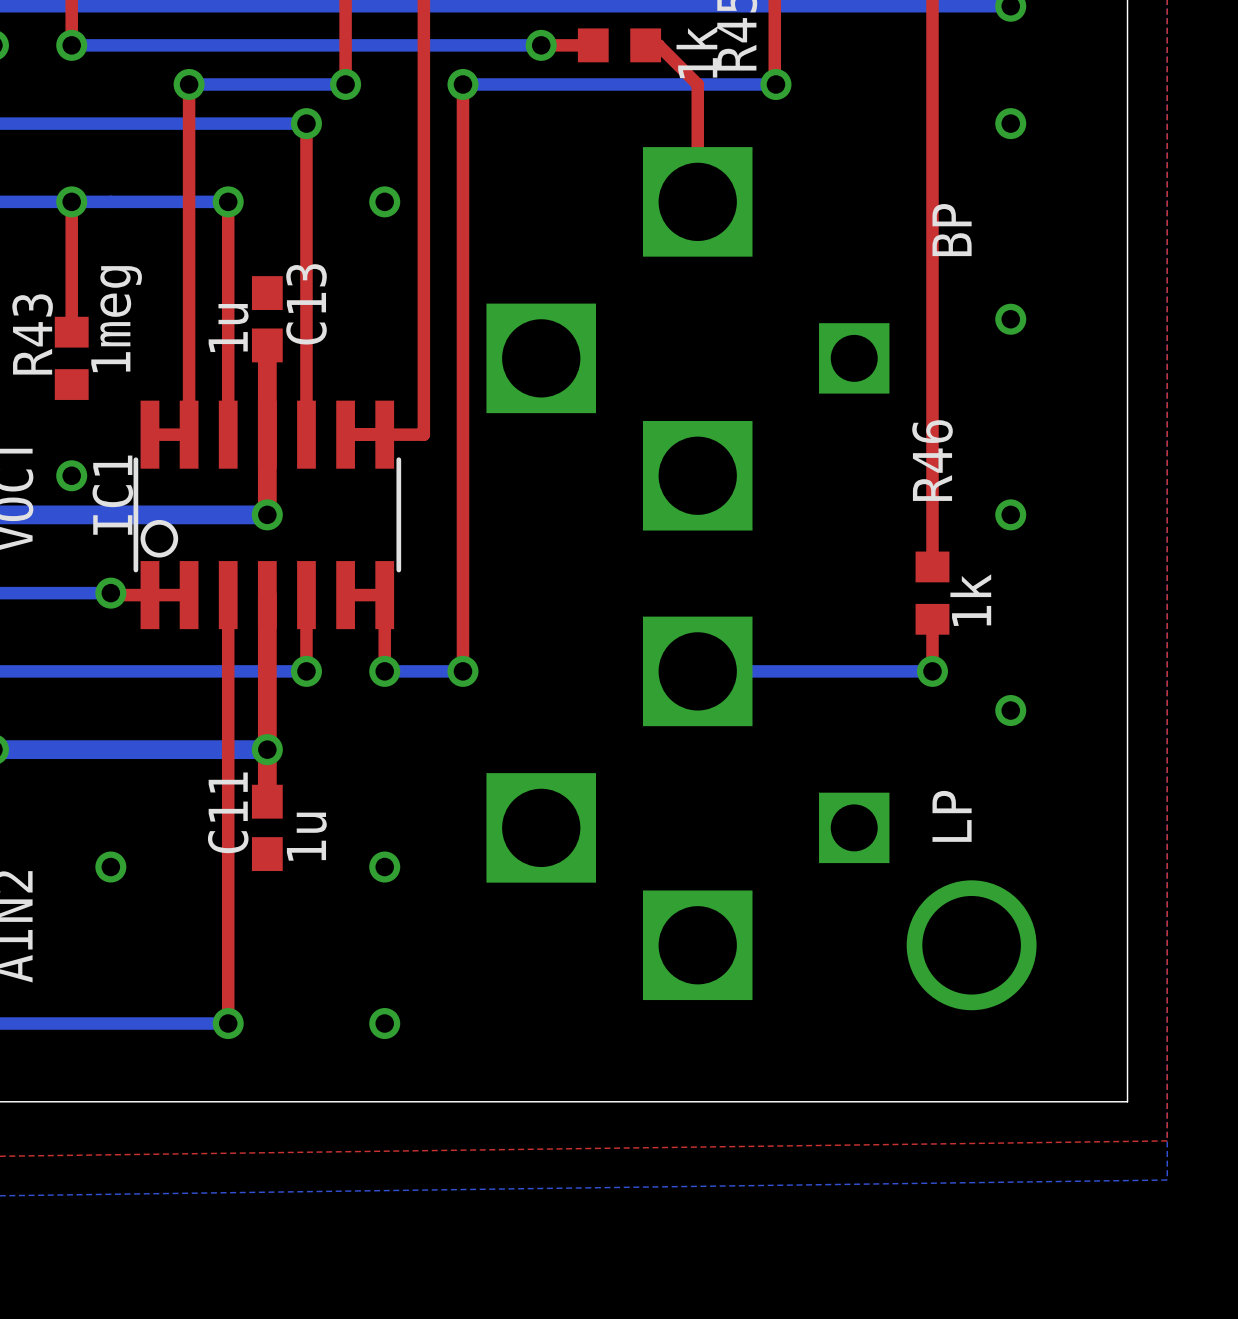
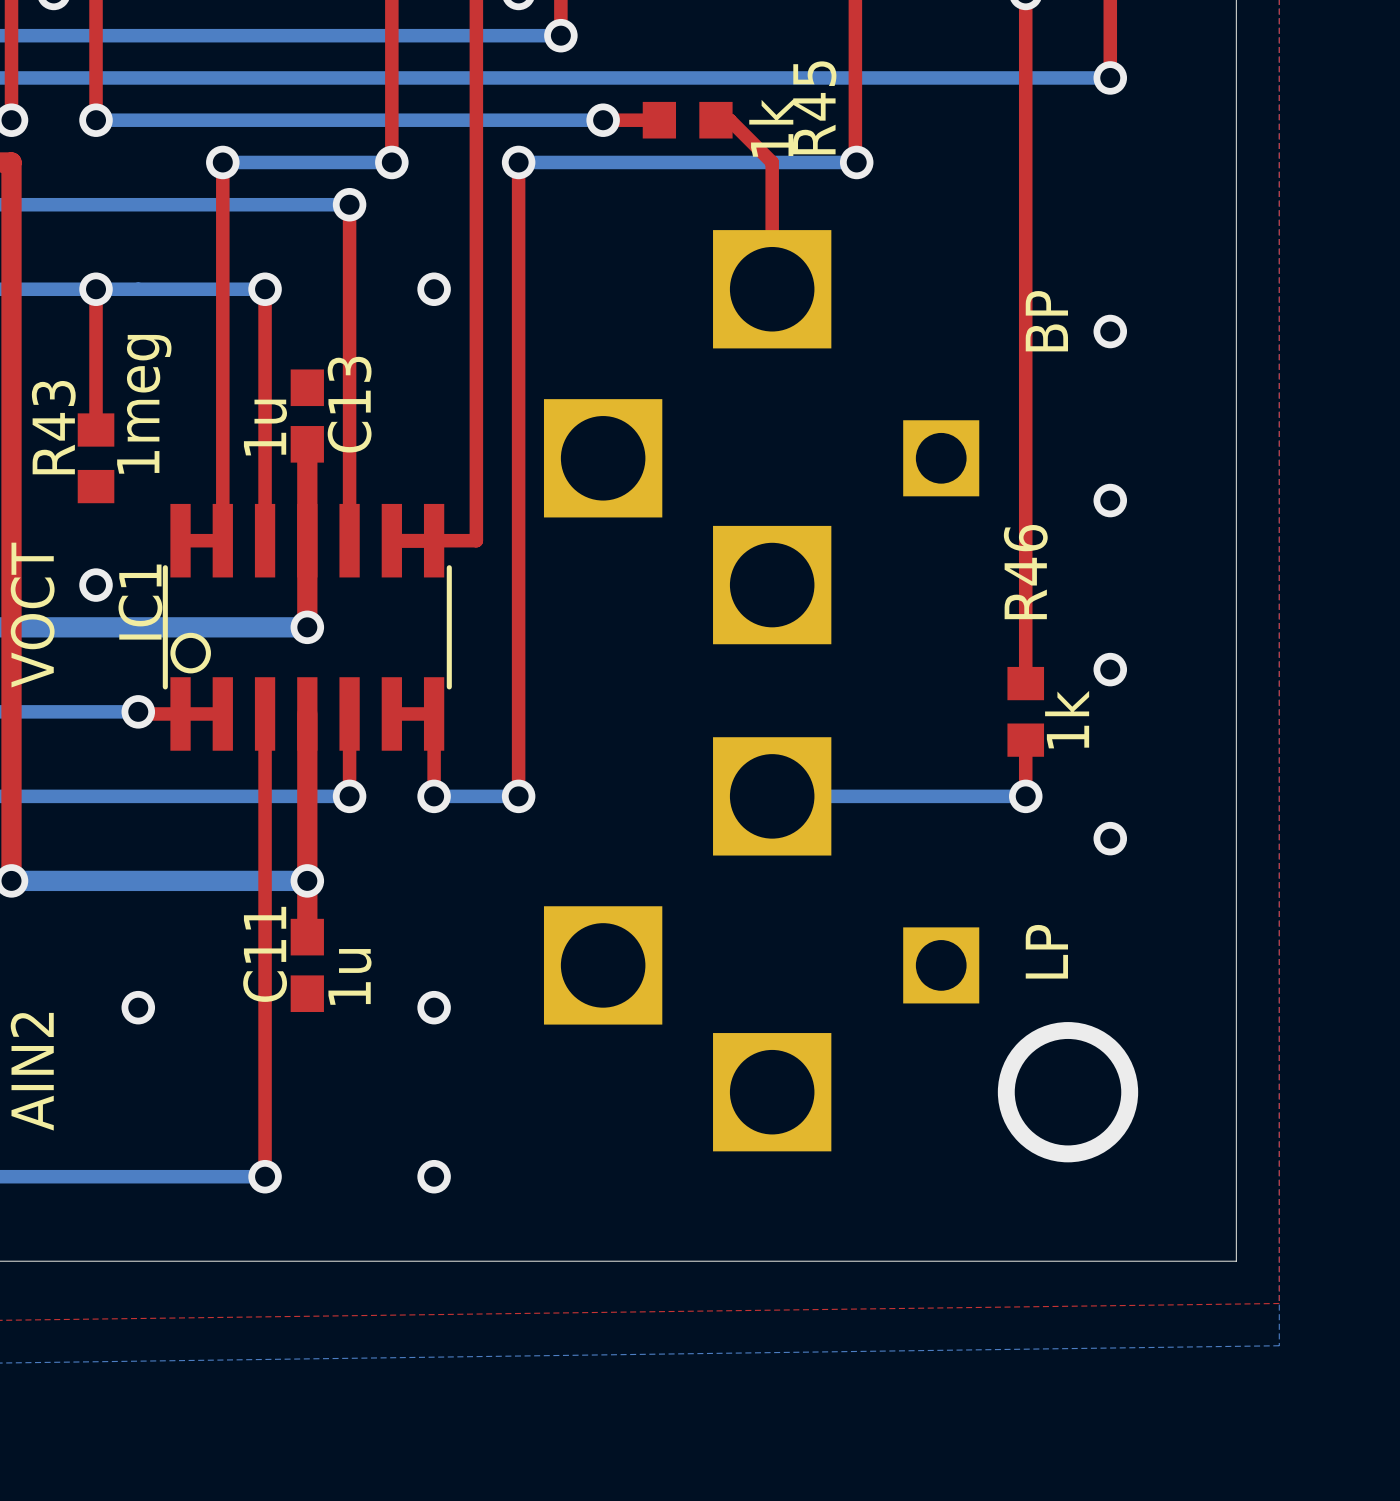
via: (1010, 123) -> none
via: none -> (1110, 331)
via: (1010, 319) -> none
via: none -> (1110, 500)
via position: (1010, 514) -> (1110, 669)

